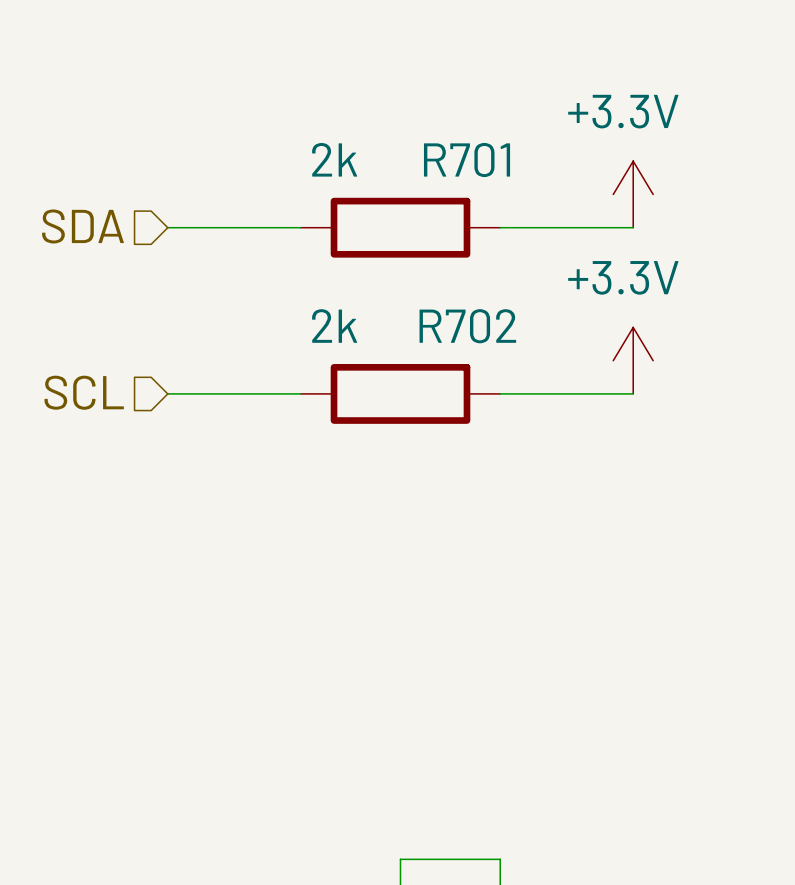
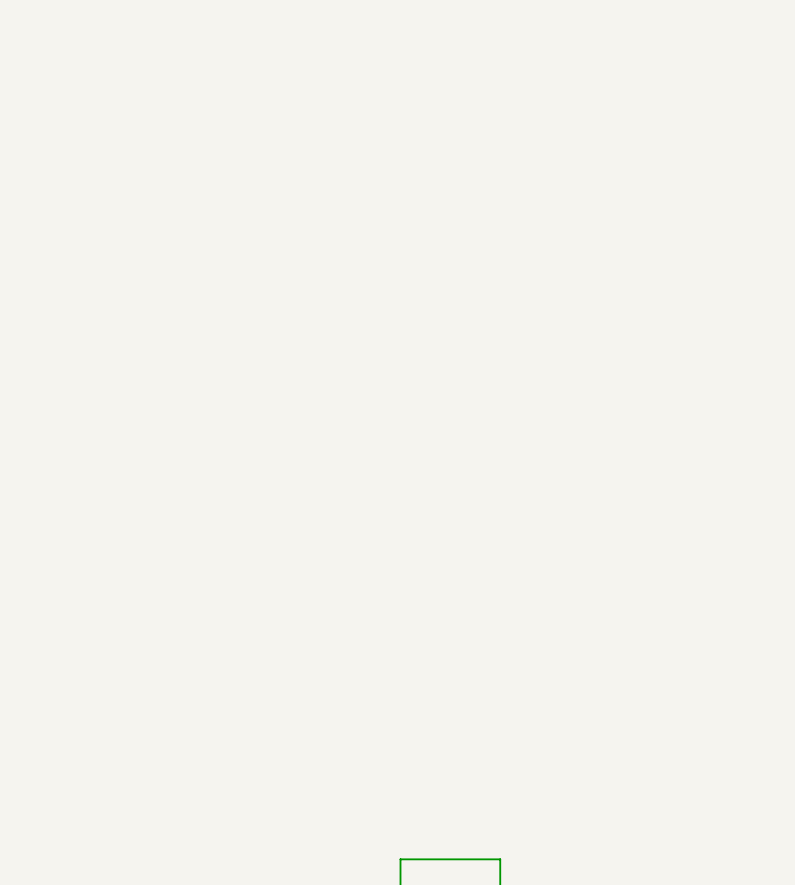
power symbol: +3.3V (633, 194) -> none
hierarchical label: SDA (83, 226) -> none
wire: (167, 227) (300, 227) -> none
R701: 2k (400, 227) -> none
wire: (500, 227) (633, 227) -> none
power symbol: +3.3V (633, 360) -> none
hierarchical label: SCL (84, 392) -> none
wire: (167, 393) (300, 393) -> none
R702: 2k (400, 393) -> none
wire: (500, 393) (633, 393) -> none

